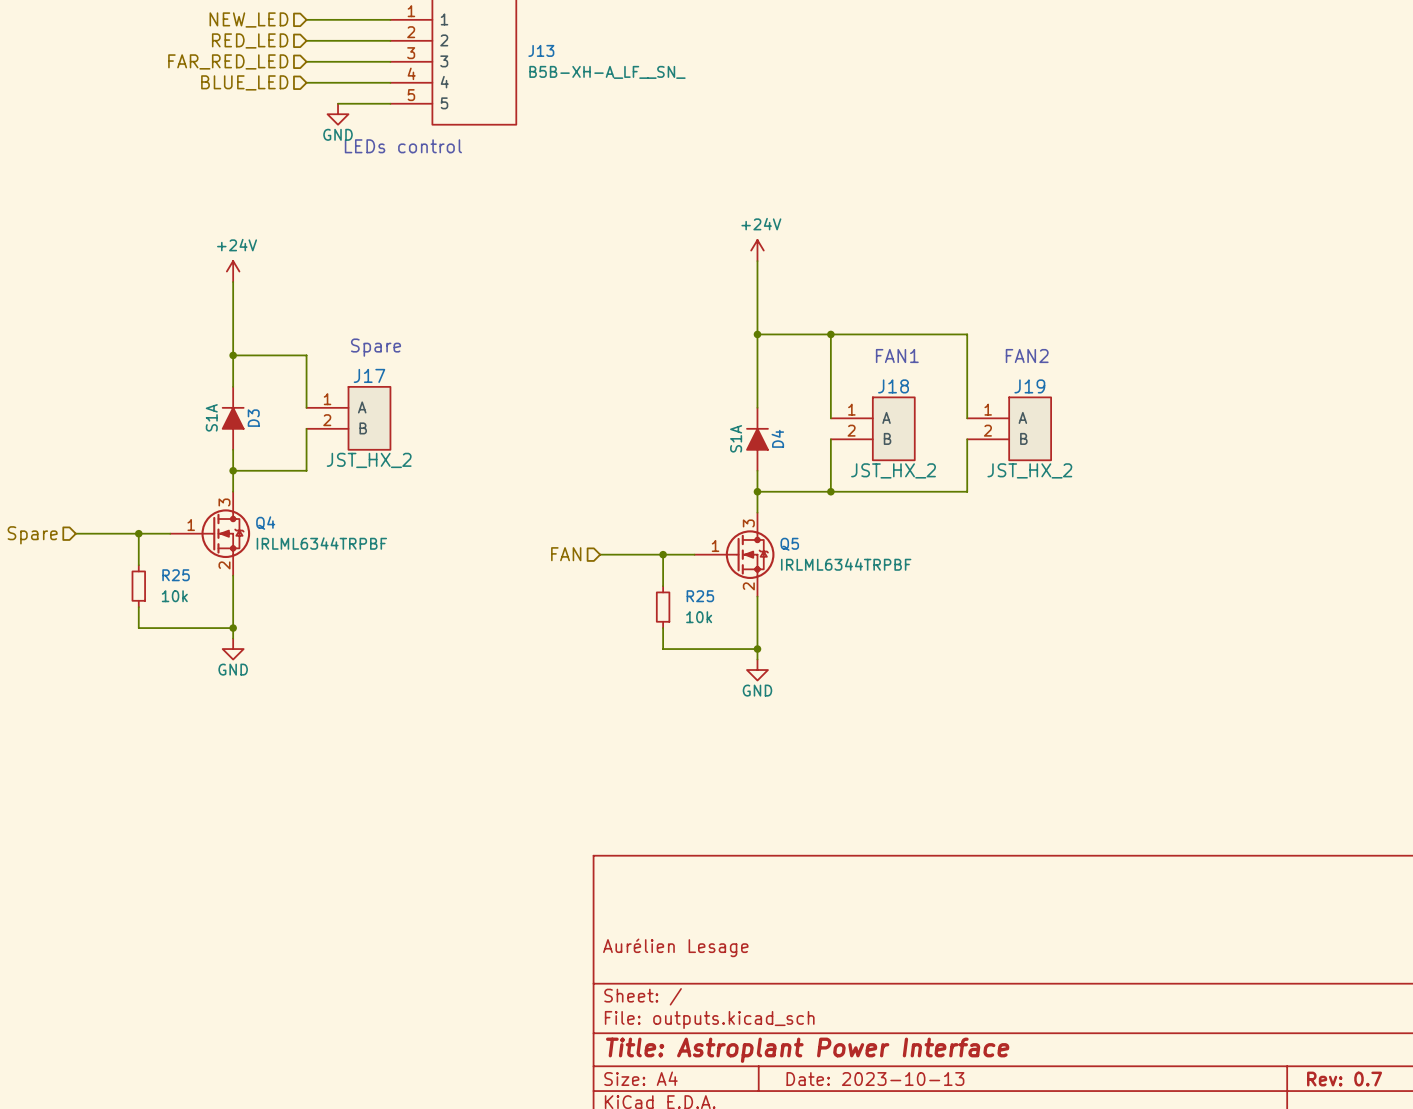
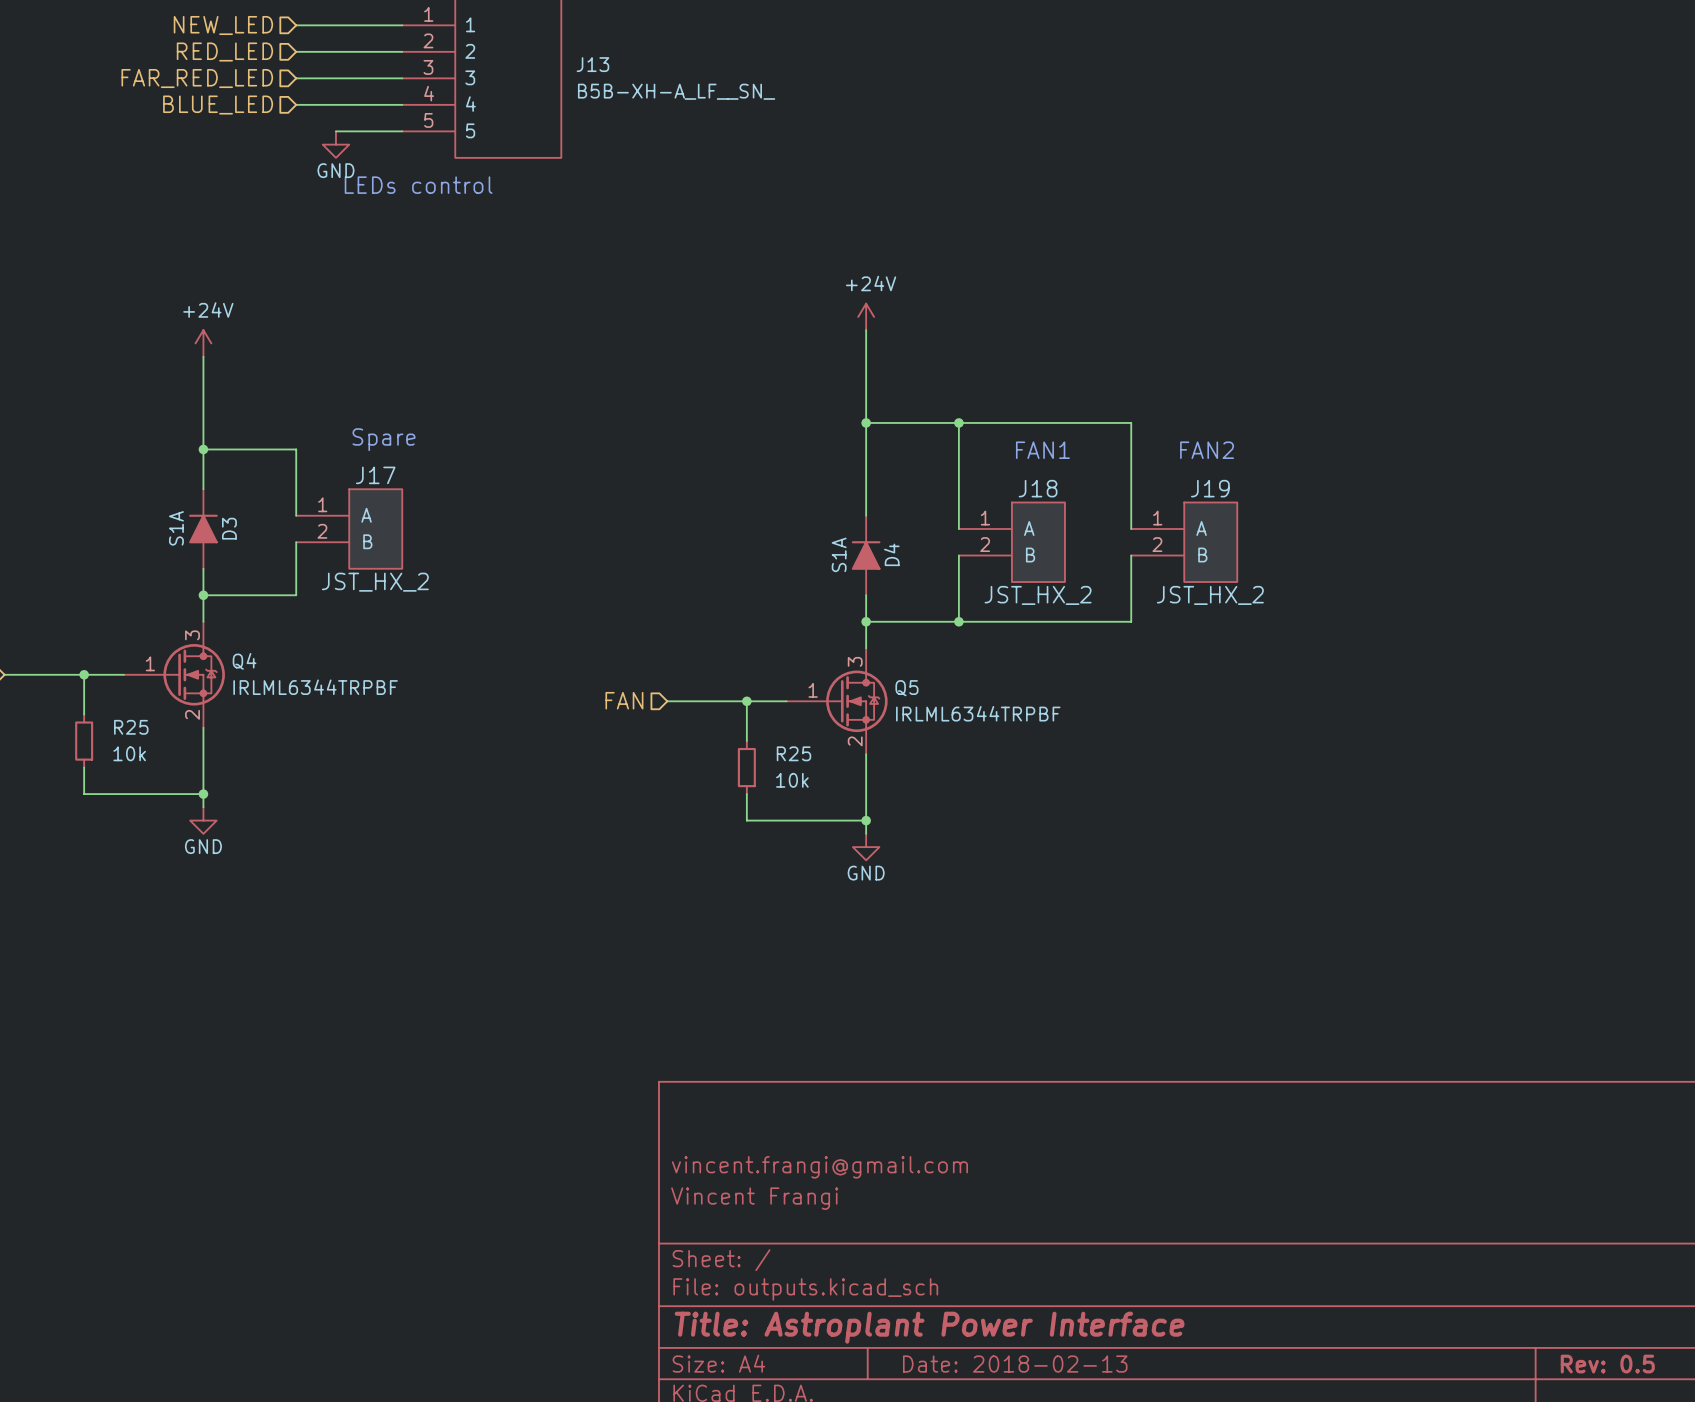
title block: none -> vincent.frangi@gmail.com (819, 1167)
title block: Aurélien Lesage (675, 947) -> Vincent Frangi (754, 1198)
title block: Date: 2023-10-13 (875, 1079) -> Date: 2018-02-13 (1015, 1364)
title block: Rev: 0.7 (1344, 1079) -> Rev: 0.5 (1607, 1364)

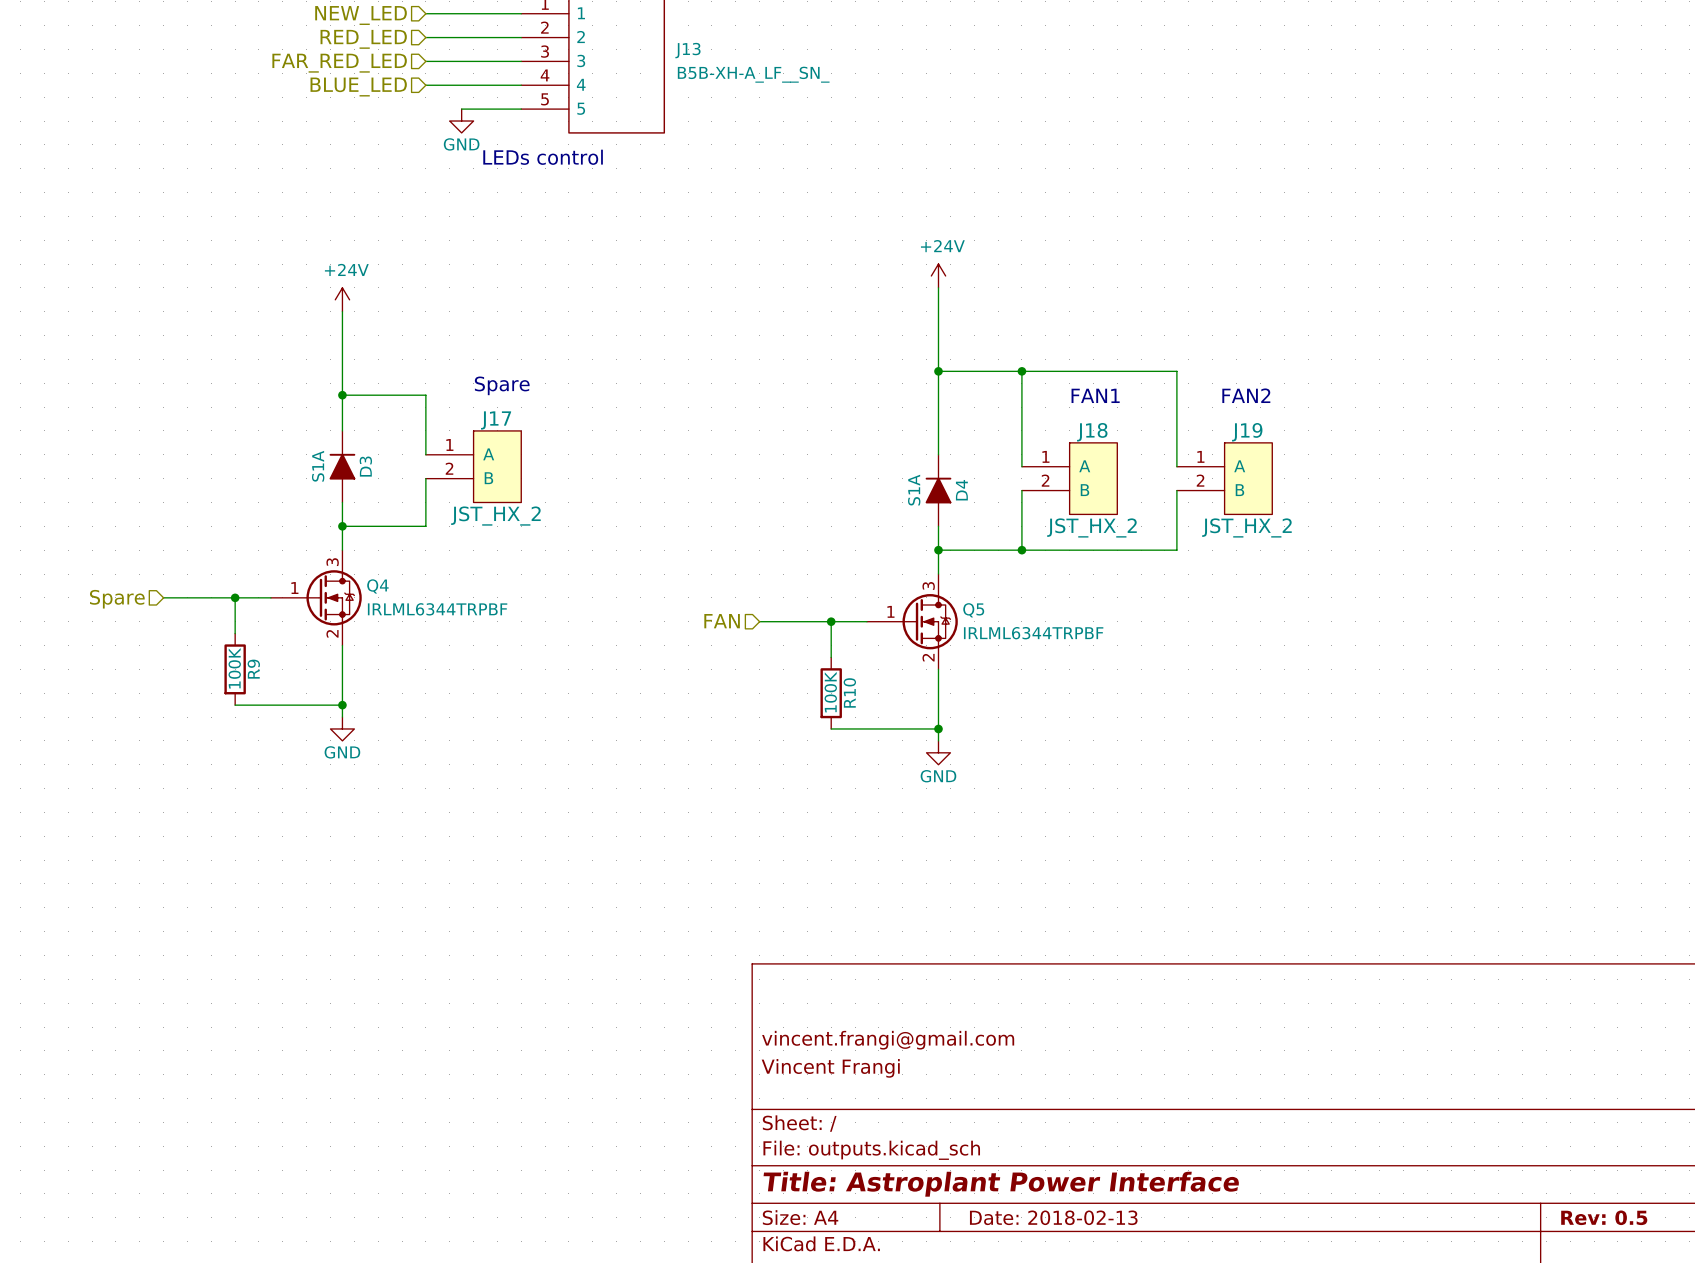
R25: 10k (84, 741) -> none
R9: none -> 100K (235, 669)
R25: 10k (746, 767) -> none
R10: none -> 100K (831, 693)

